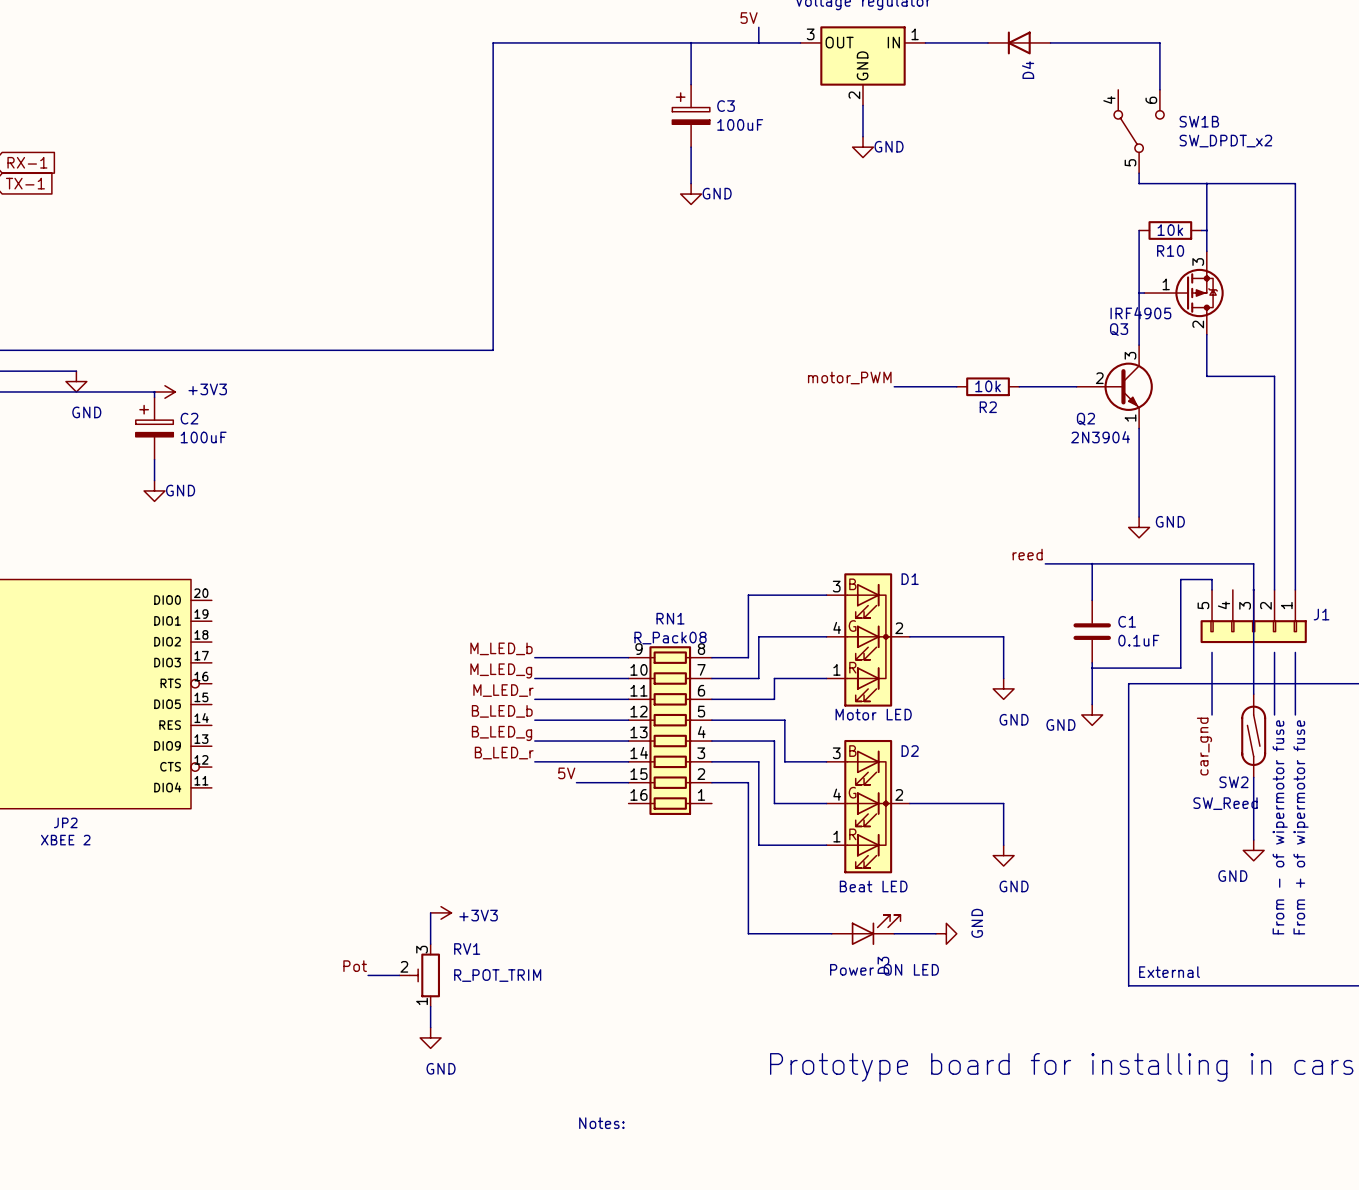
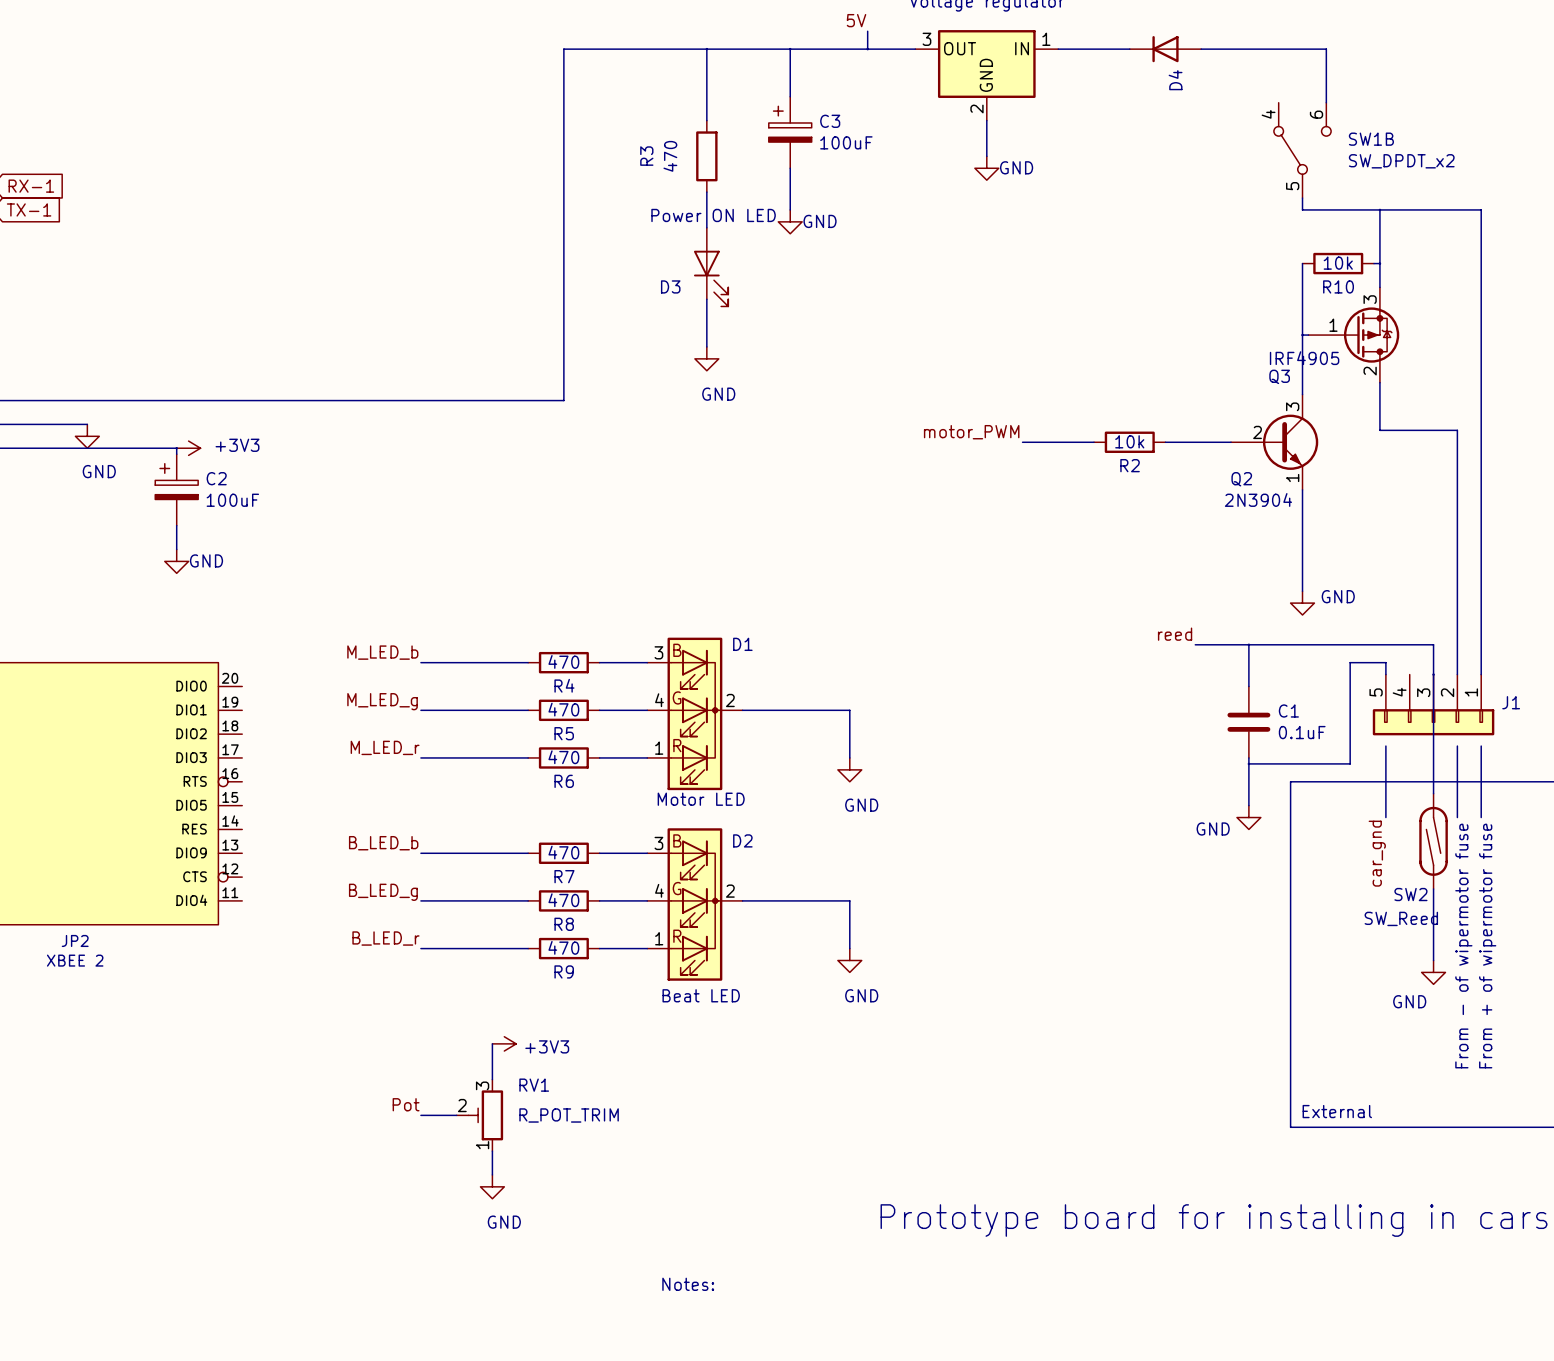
wire: none -> (706, 49) (706, 120)
R3: none -> 470 (706, 156)
wire: none -> (706, 192) (706, 227)
wire: none -> (706, 299) (706, 346)
power symbol: none -> GND (706, 358)
R4: none -> 470 (563, 662)
wire: none -> (599, 662) (647, 662)
wire: (826, 595) (748, 595) (748, 657) (711, 657) -> none
R5: none -> 470 (563, 710)
wire: none -> (599, 710) (647, 710)
wire: none -> (742, 710) (849, 710) (849, 757)
wire: (826, 636) (758, 636) (758, 678) (711, 678) -> none
wire: (909, 636) (1003, 636) (1003, 678) -> none
D1 position: (868, 639) -> (694, 713)
label position: M_LED_b (501, 648) -> M_LED_b (382, 652)
wire: (534, 657) (628, 657) -> (420, 662) (528, 662)
R6: none -> 470 (563, 757)
wire: none -> (599, 757) (647, 757)
label position: M_LED_g (501, 670) -> M_LED_g (382, 701)
power symbol: none -> GND (849, 769)
wire: (534, 678) (628, 678) -> (420, 853) (528, 853)
wire: (826, 678) (774, 678) (774, 699) (711, 699) -> none
power symbol: GND (1003, 688) -> none
label position: M_LED_r (503, 690) -> M_LED_r (385, 747)
wire: (534, 699) (628, 699) -> (420, 710) (528, 710)
label position: B_LED_b (502, 711) -> B_LED_b (383, 843)
wire: (534, 720) (628, 720) -> (420, 900) (528, 900)
wire: (711, 720) (784, 720) (784, 761) (826, 761) -> none
RN1: R_Pack08 (670, 730) -> none
label position: B_LED_g (501, 733) -> B_LED_g (383, 892)
wire: (534, 741) (628, 741) -> (420, 757) (528, 757)
wire: (711, 741) (774, 741) (774, 803) (826, 803) -> none
R7: none -> 470 (563, 853)
wire: none -> (599, 853) (647, 853)
label position: B_LED_r (504, 753) -> B_LED_r (385, 938)
wire: (534, 761) (628, 761) -> (420, 948) (528, 948)
wire: (711, 761) (758, 761) (758, 845) (826, 845) -> none
label: 5V (566, 773) -> none
wire: (711, 782) (748, 782) (748, 933) (831, 933) -> none
R8: none -> 470 (563, 900)
wire: none -> (599, 900) (647, 900)
wire: none -> (742, 900) (849, 900) (849, 948)
wire: (909, 803) (1003, 803) (1003, 845) -> none
D2 position: (868, 806) -> (694, 904)
R9: none -> 470 (563, 948)
wire: none -> (599, 948) (647, 948)
power symbol: none -> GND (849, 960)
power symbol: GND (1003, 855) -> none
D3 position: (866, 930) -> (711, 267)
D3 rotation: 0° (876, 930) -> 90° clockwise (711, 278)
wire: (894, 933) (935, 933) -> none
power symbol: GND (946, 933) -> none
D3 value position: Power ON LED (884, 969) -> Power ON LED (713, 215)

